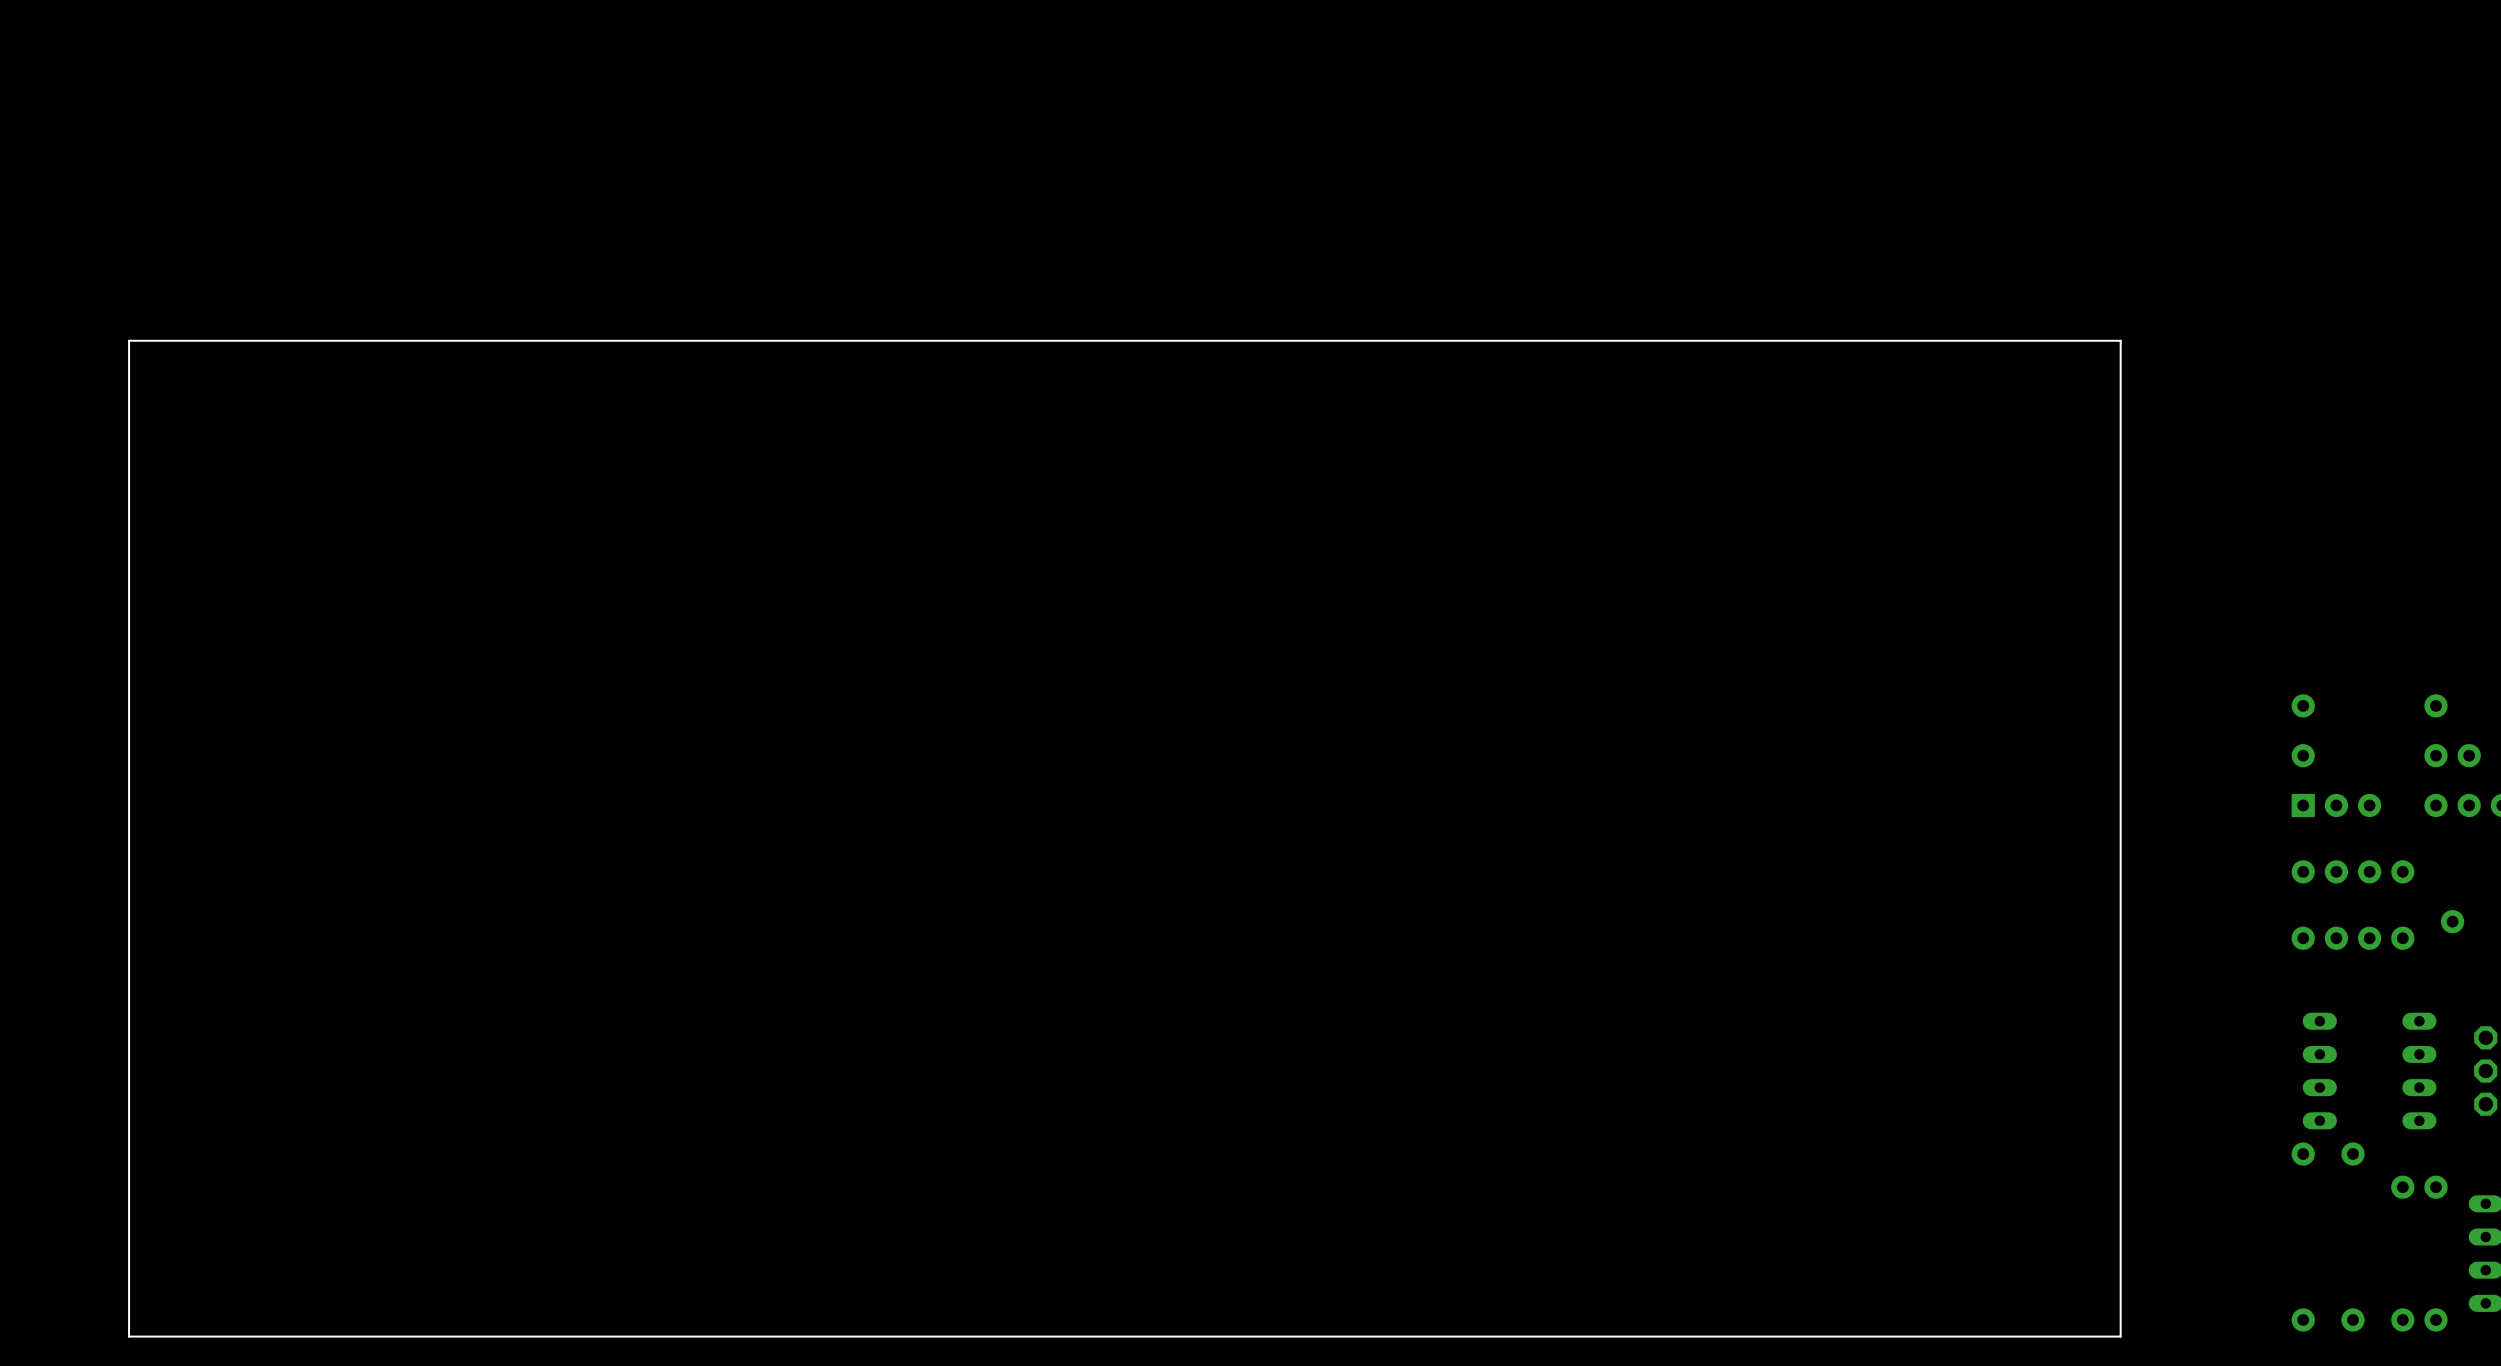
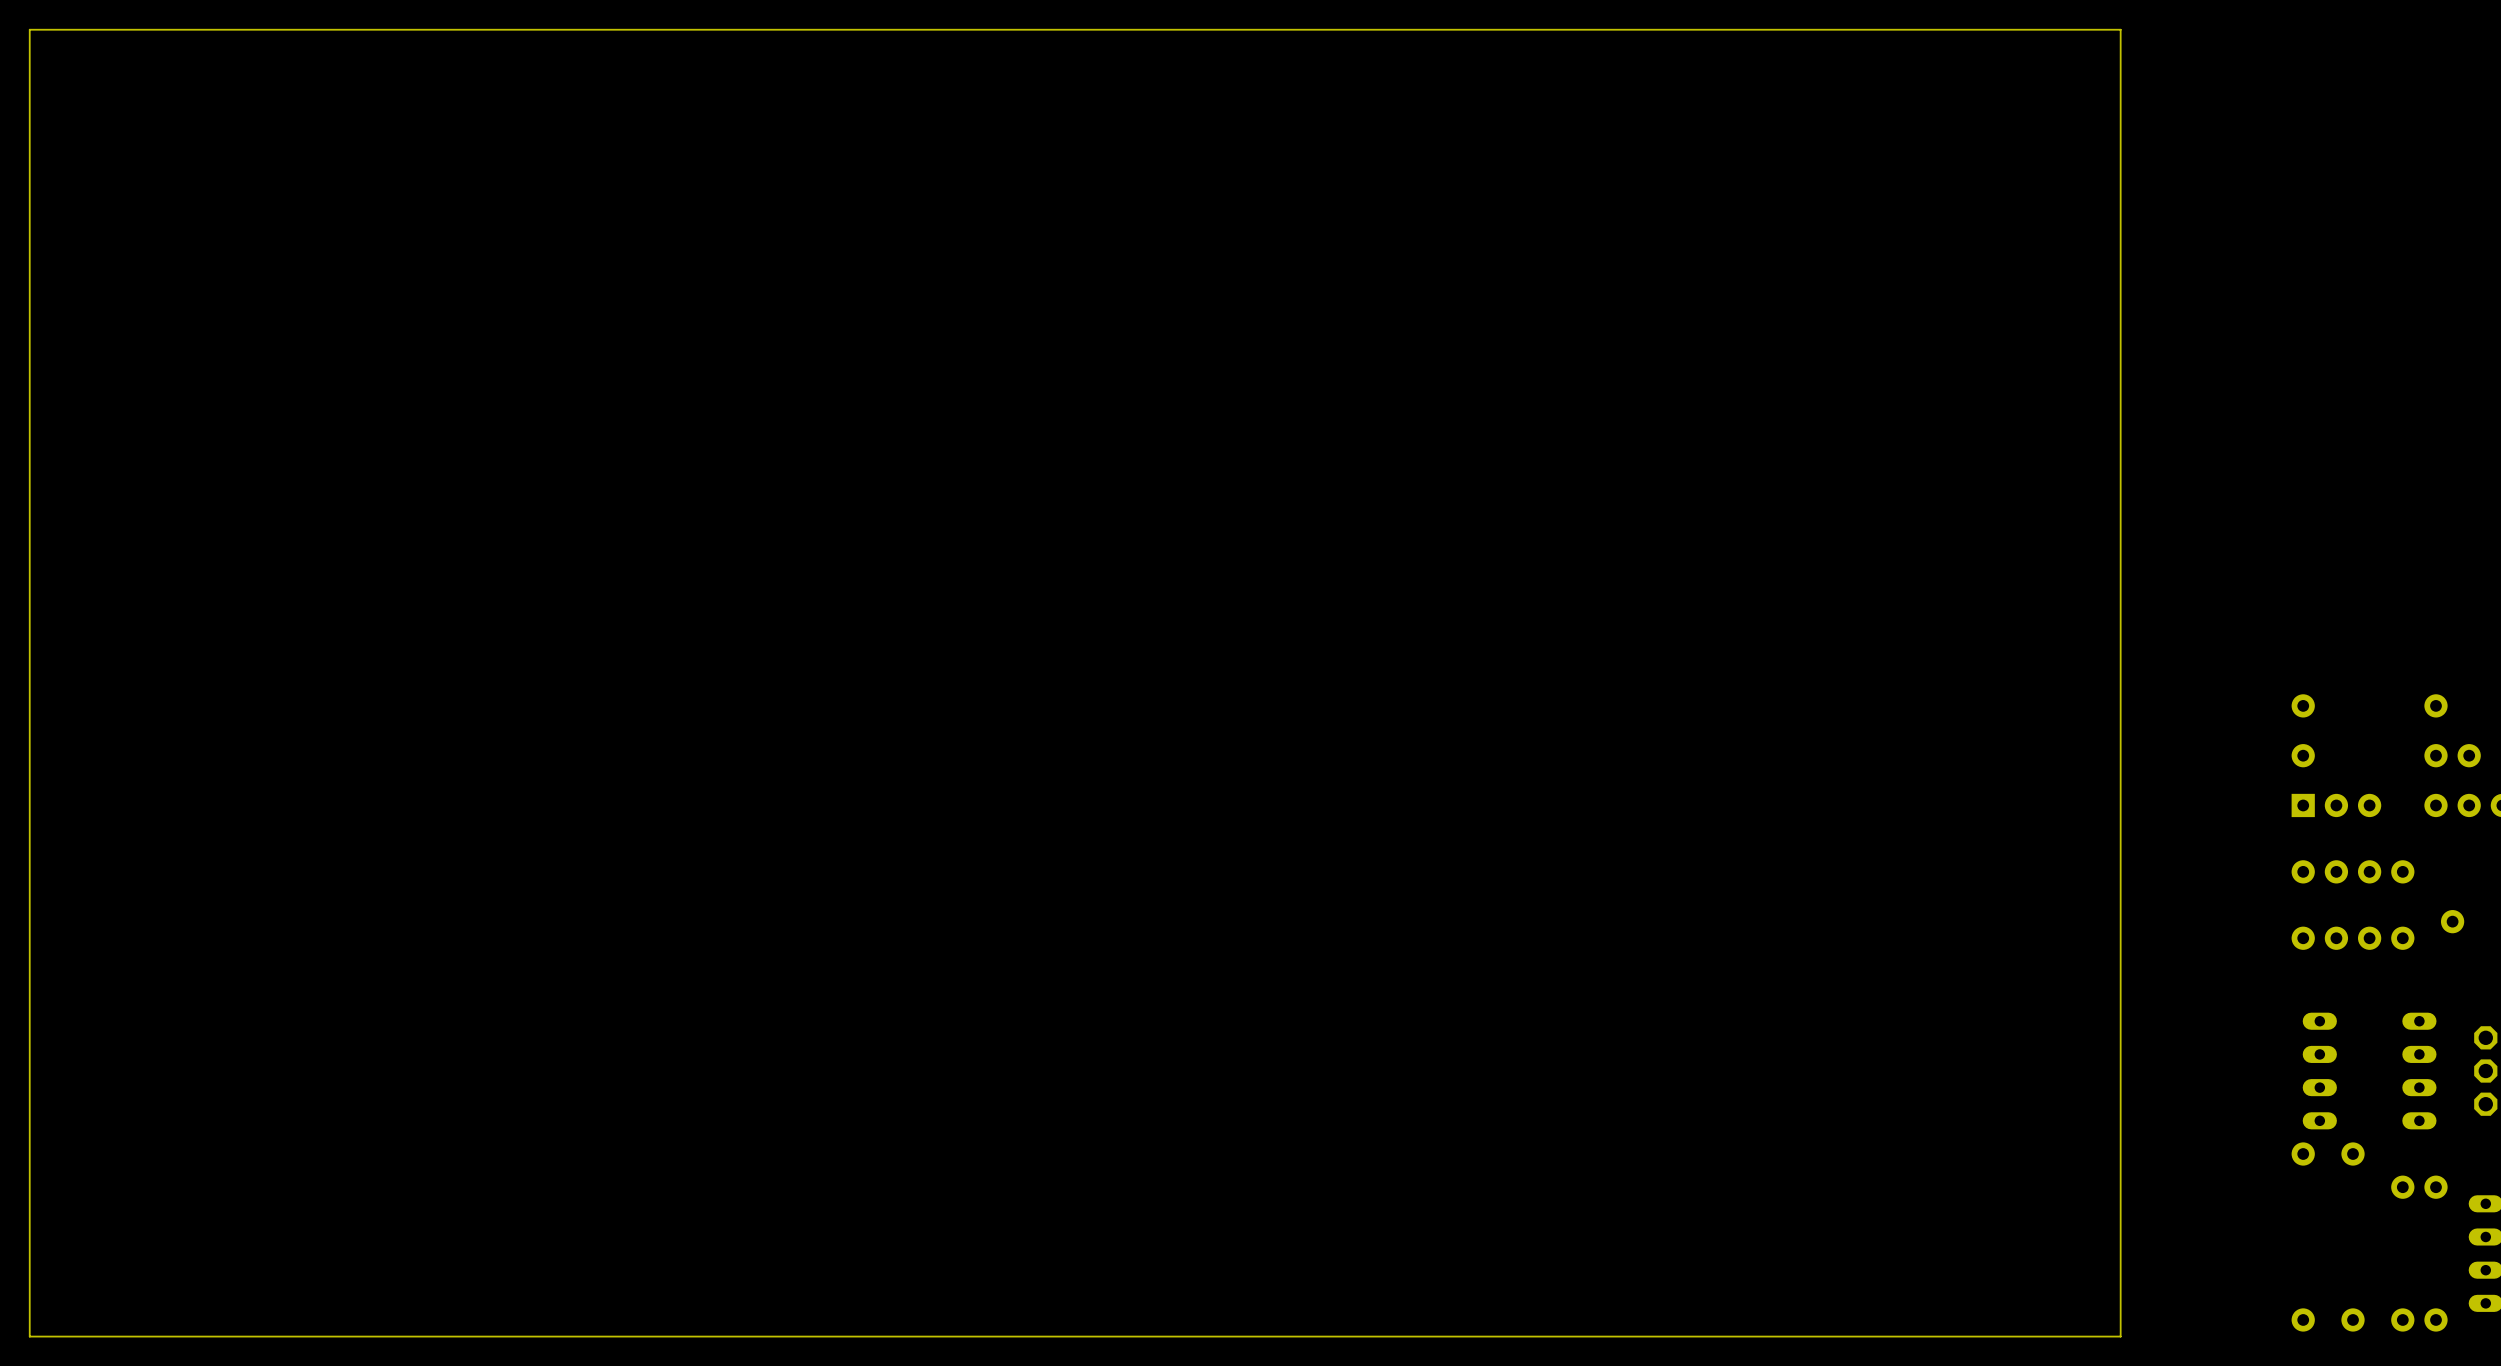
board edge: (2120, 340) (129, 340) (129, 1336) -> (2120, 340) (2120, 29) (29, 29) (29, 1336) (129, 1336)

